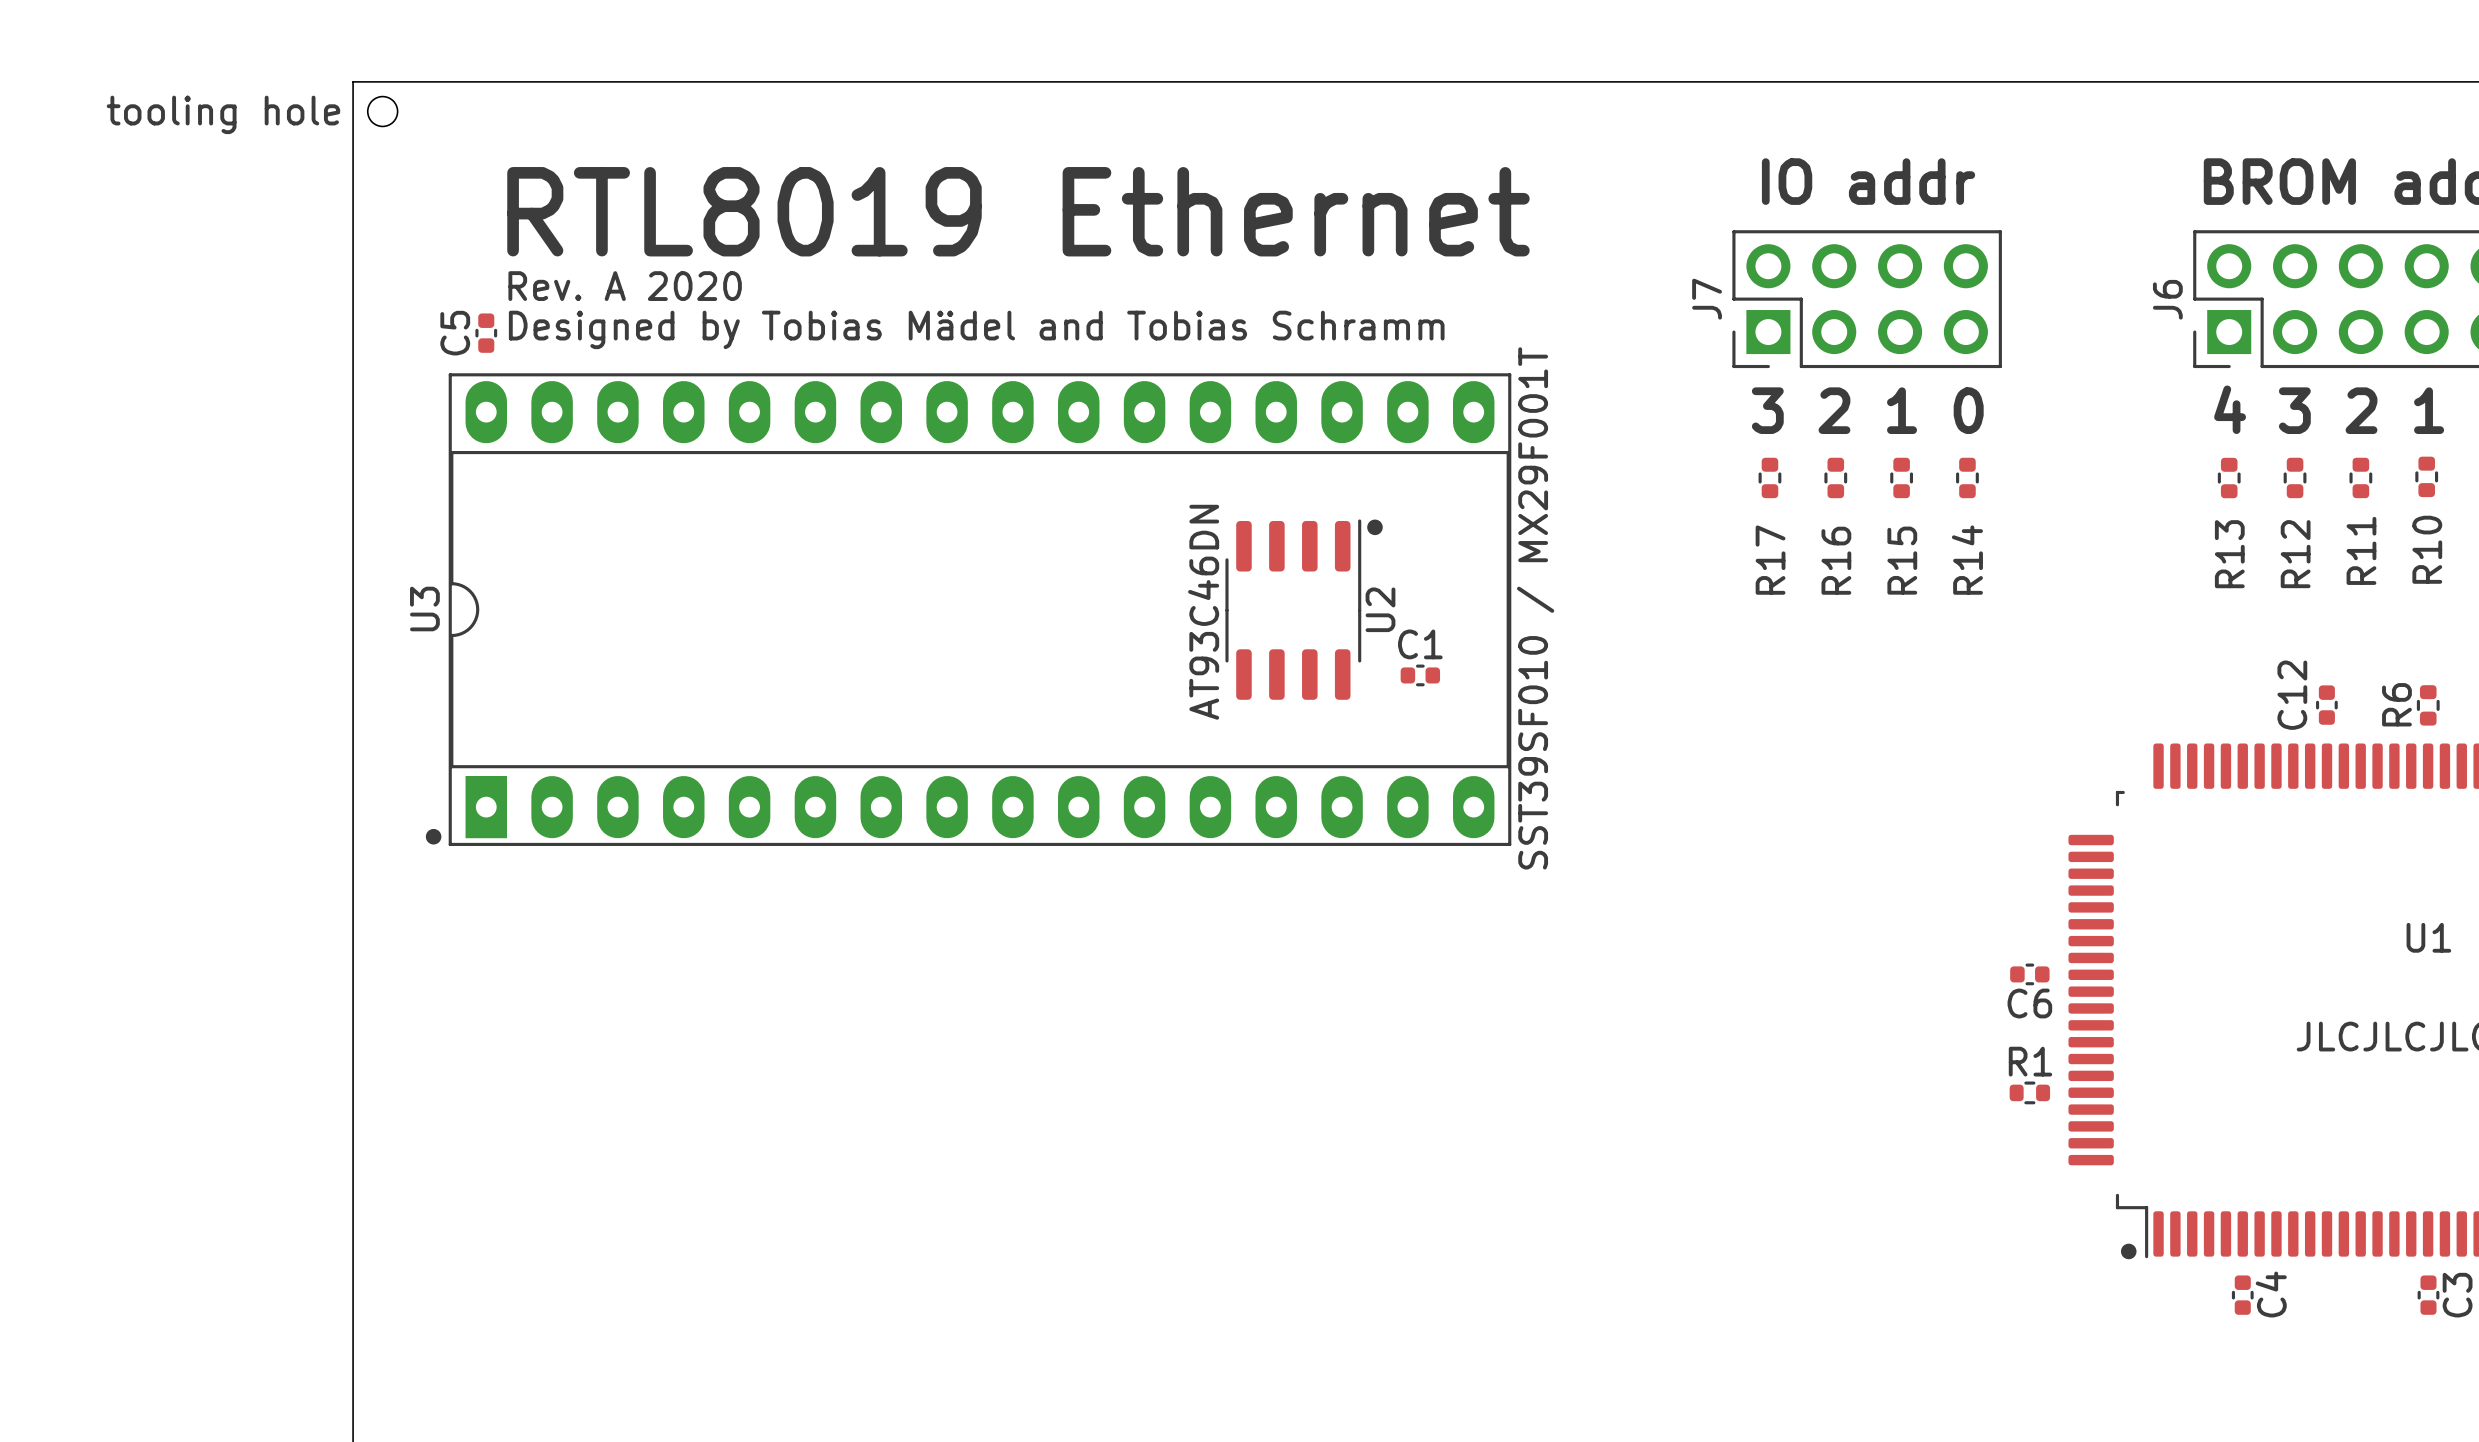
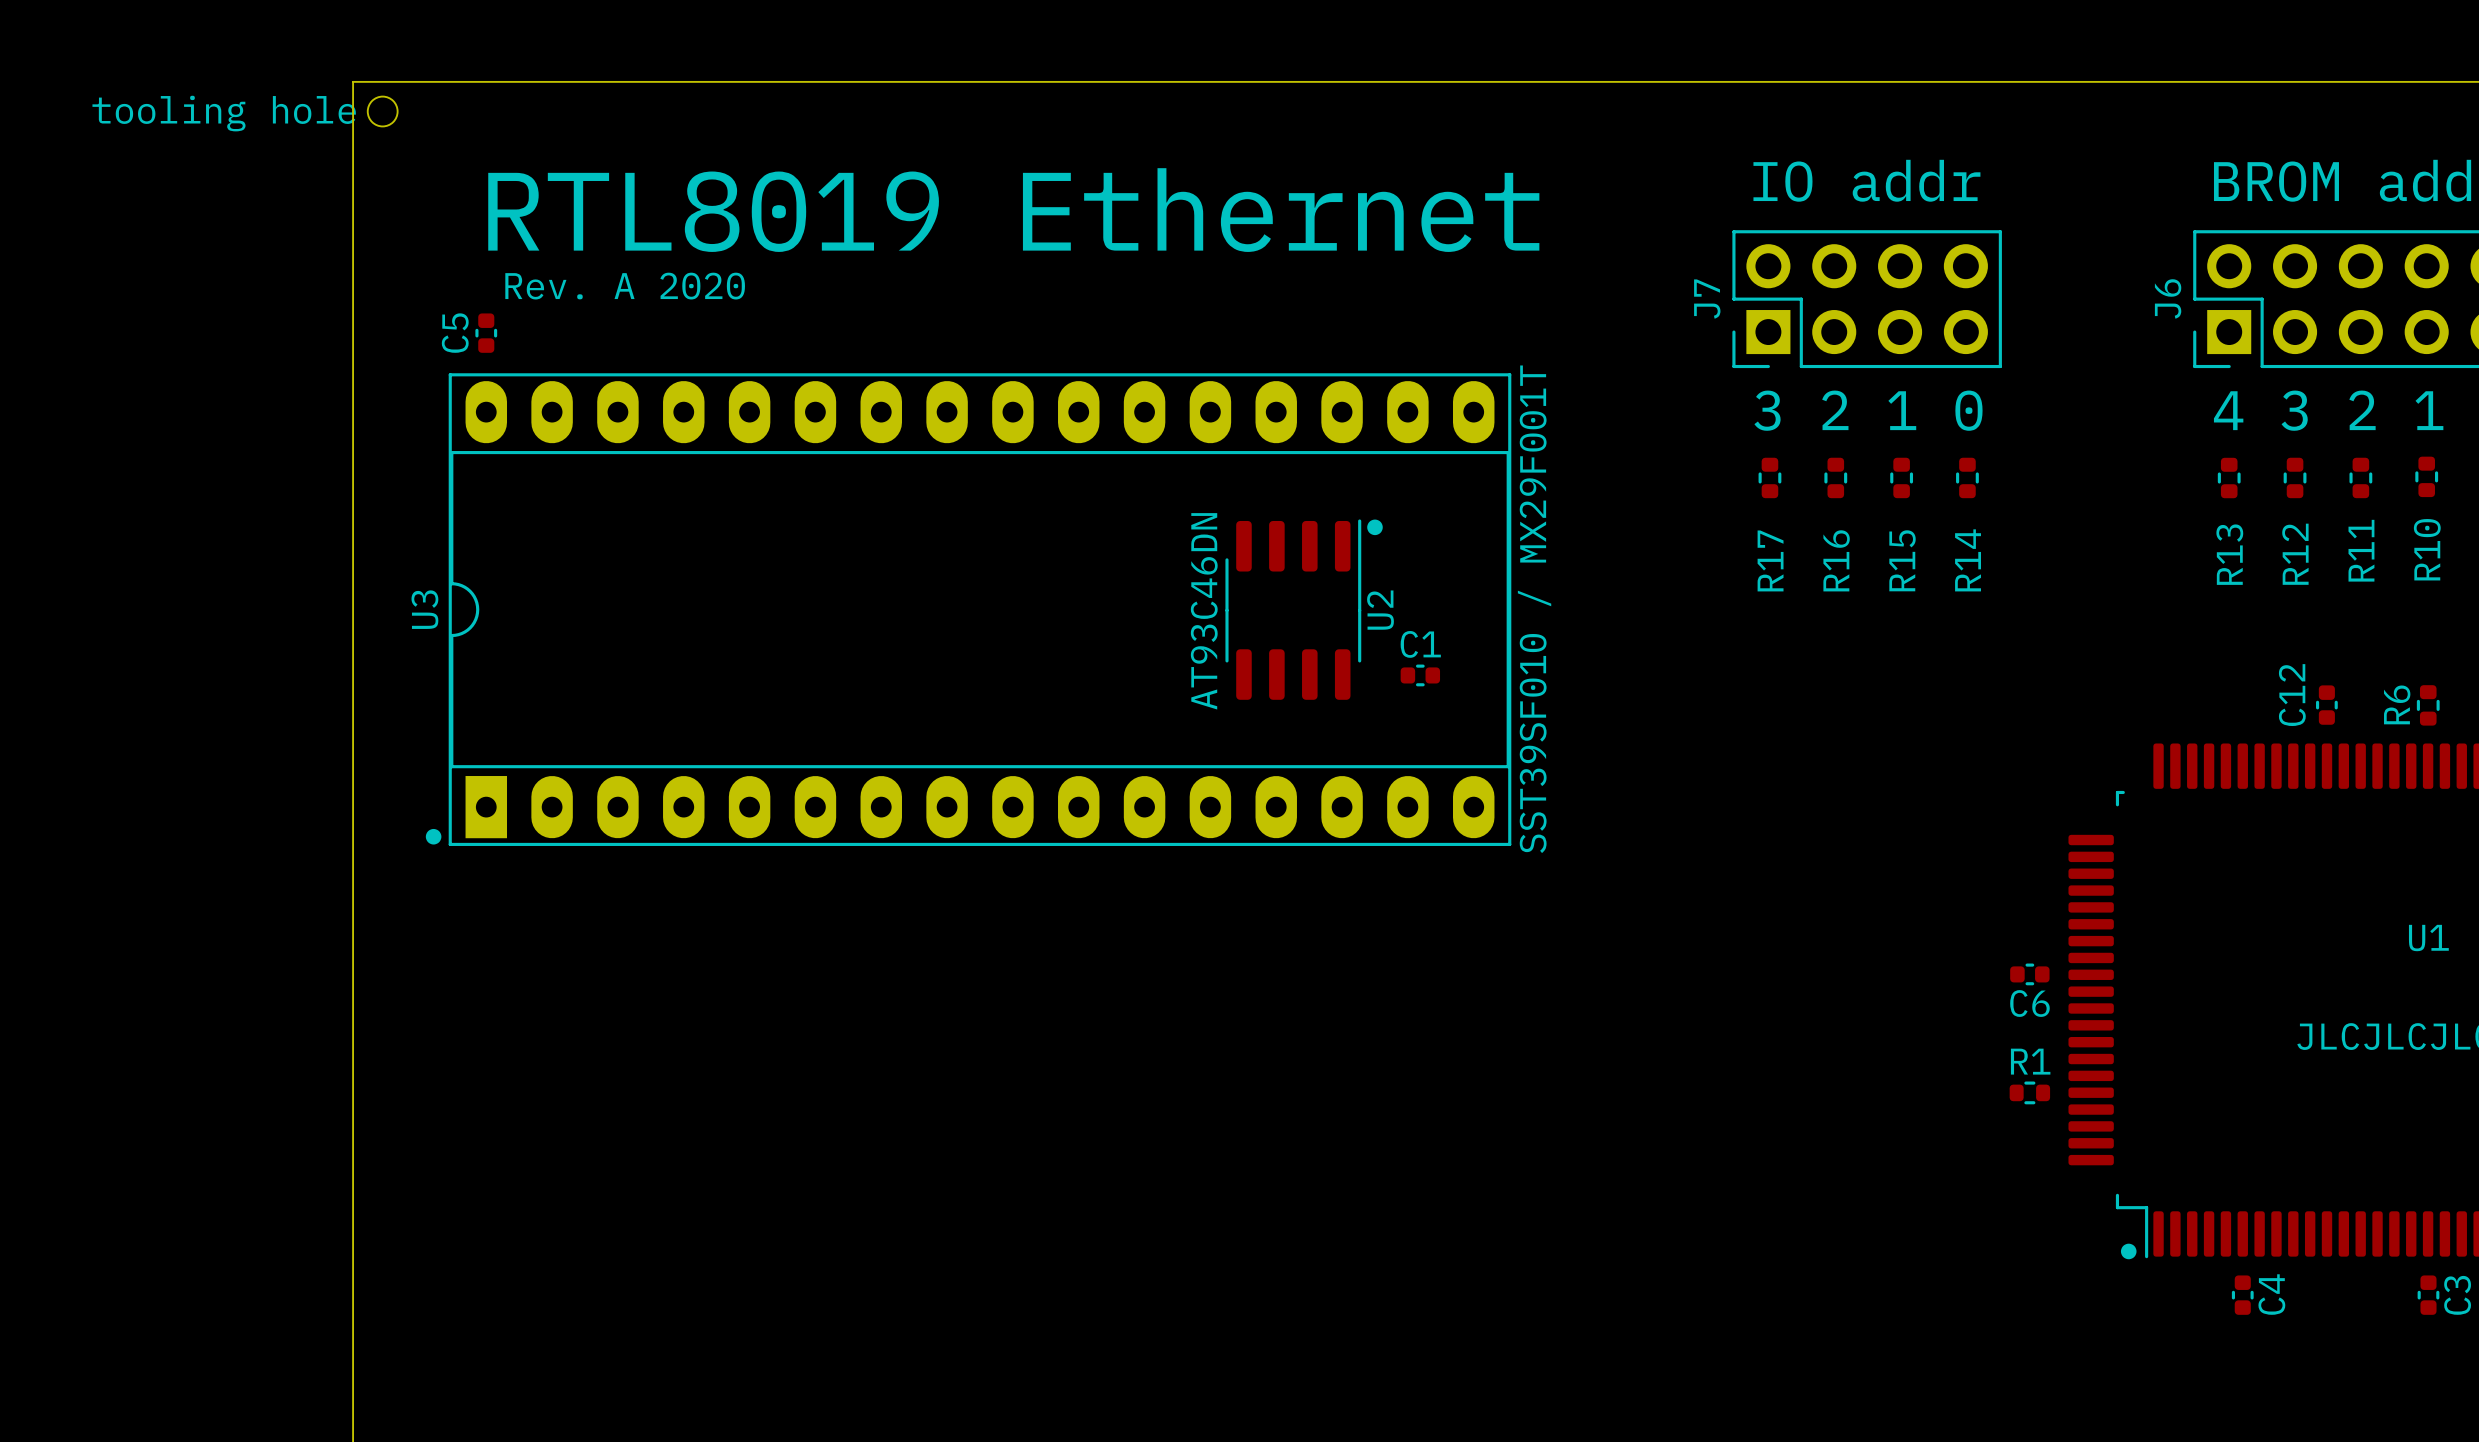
text: Designed by Tobias Mädel and Tobias Schramm (976, 329) -> none

